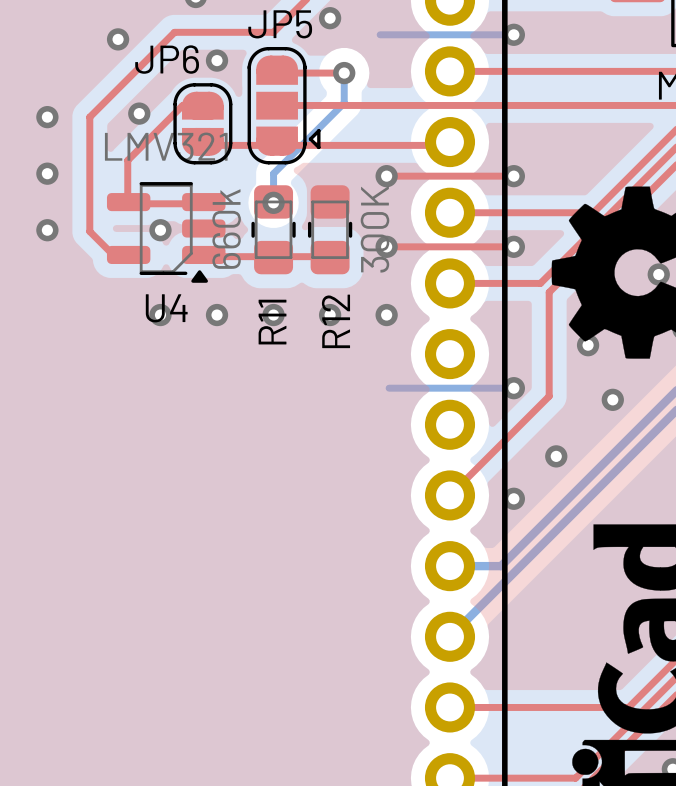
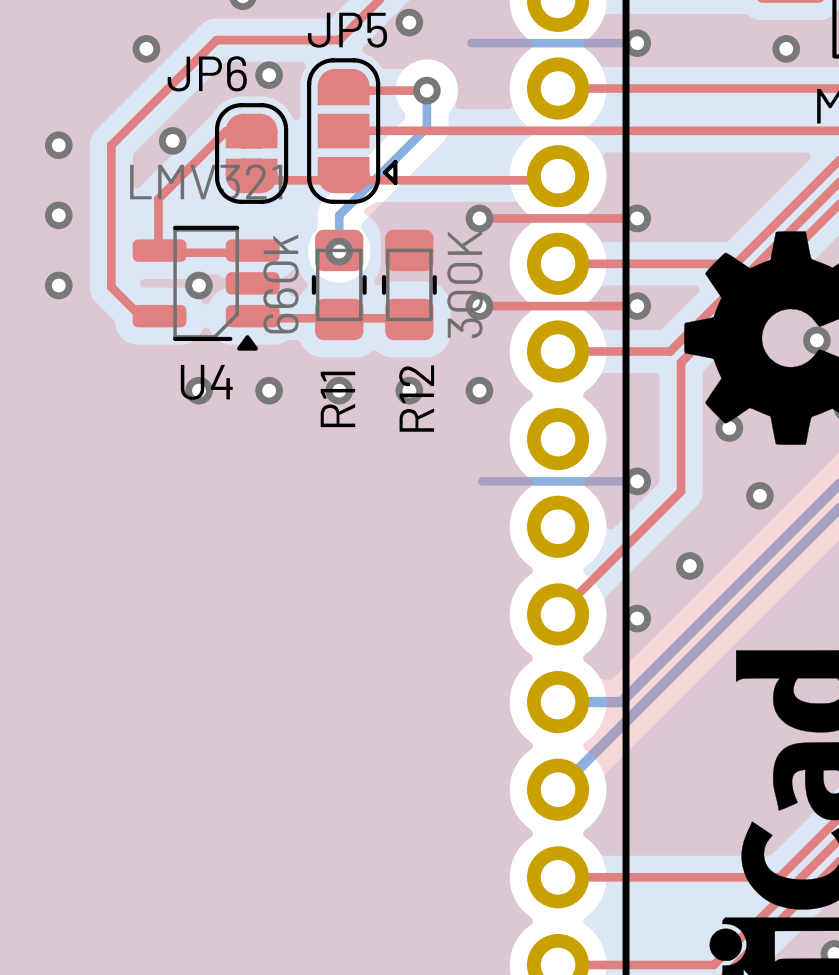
via: none -> (786, 48)

